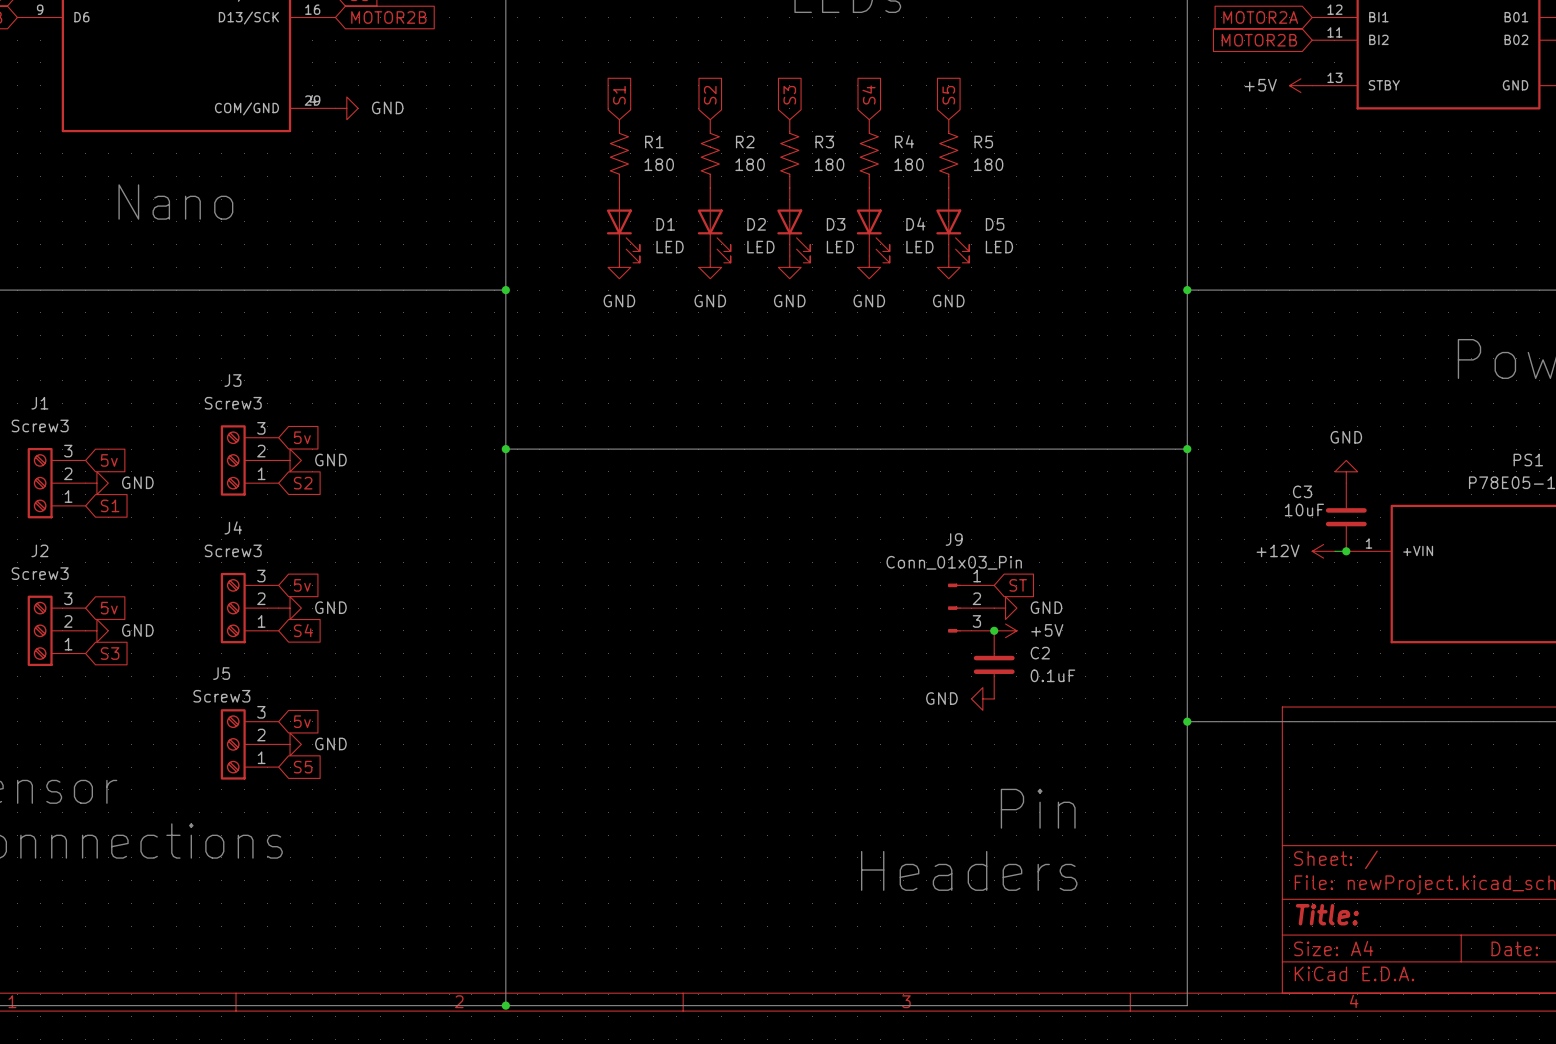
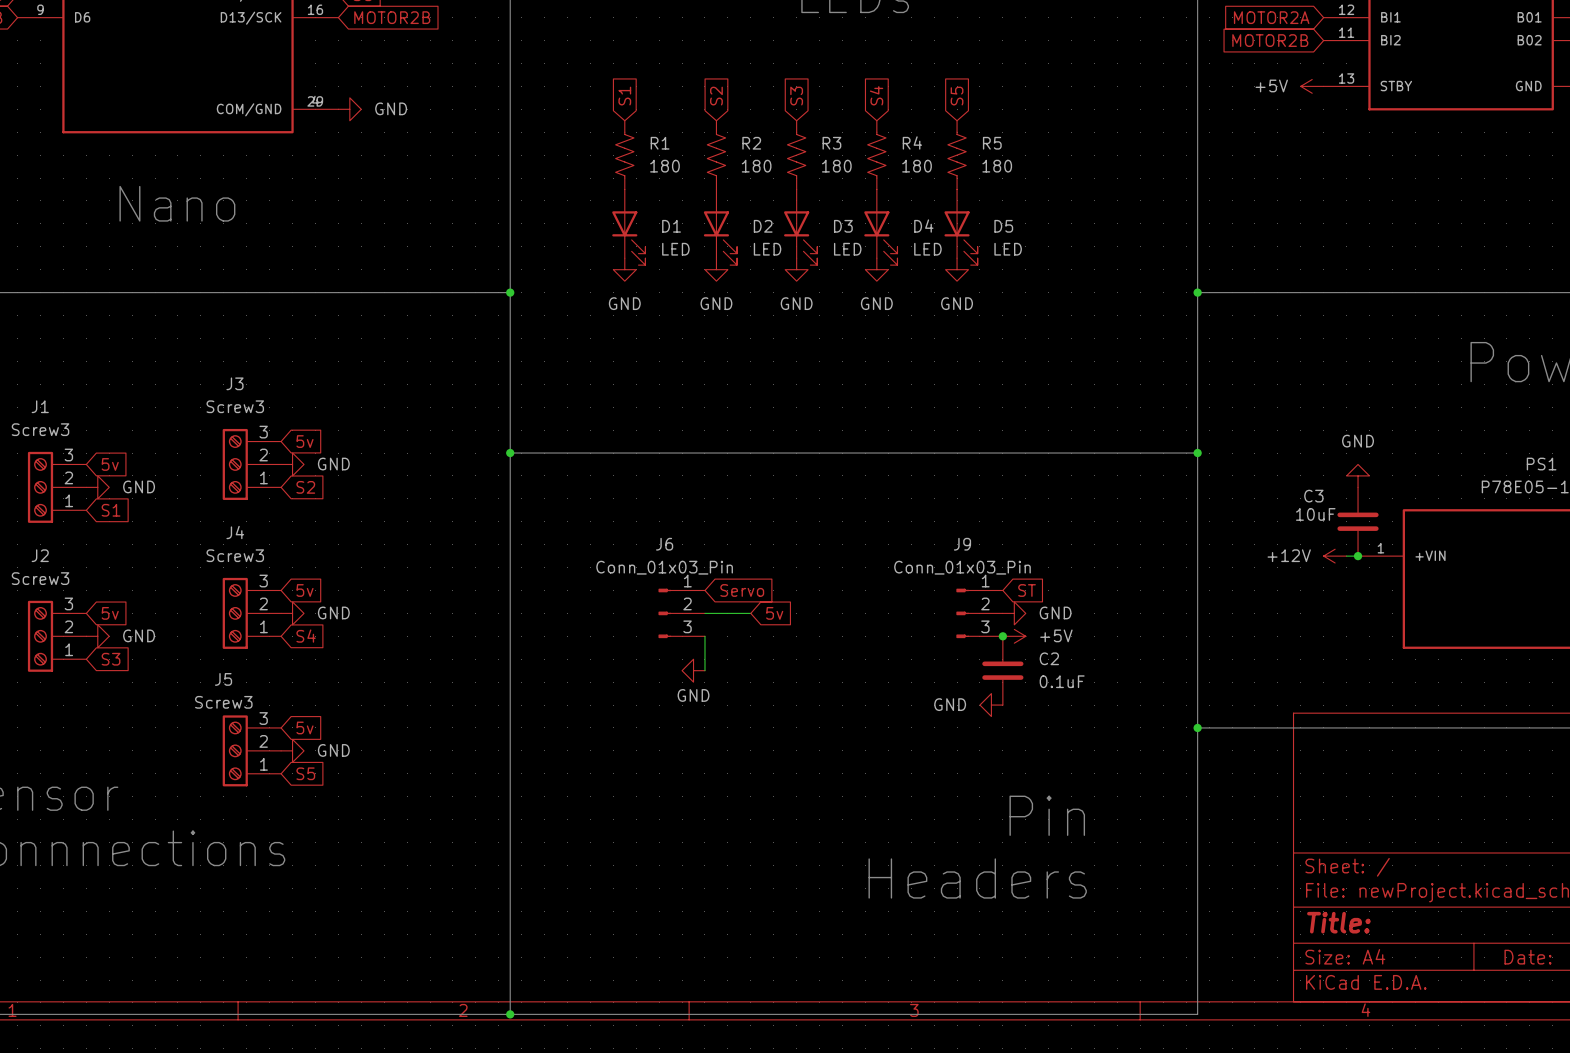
global label: none -> Servo (742, 590)
J6: none -> Conn_01x03_Pin (681, 613)
wire: none -> (704, 613) (750, 613)
global label: none -> 5v (774, 613)
wire: none -> (704, 636) (704, 670)
power symbol: none -> GND (693, 670)

